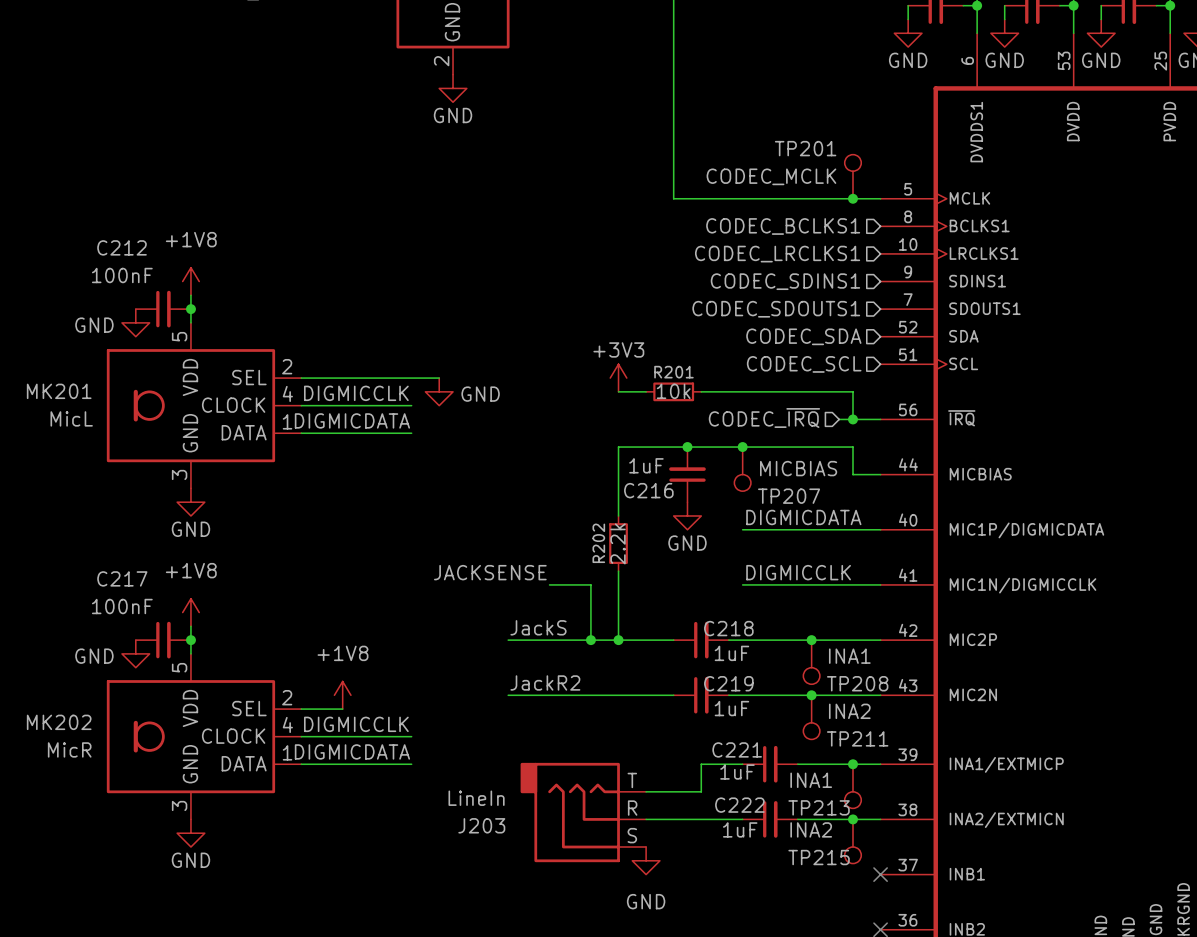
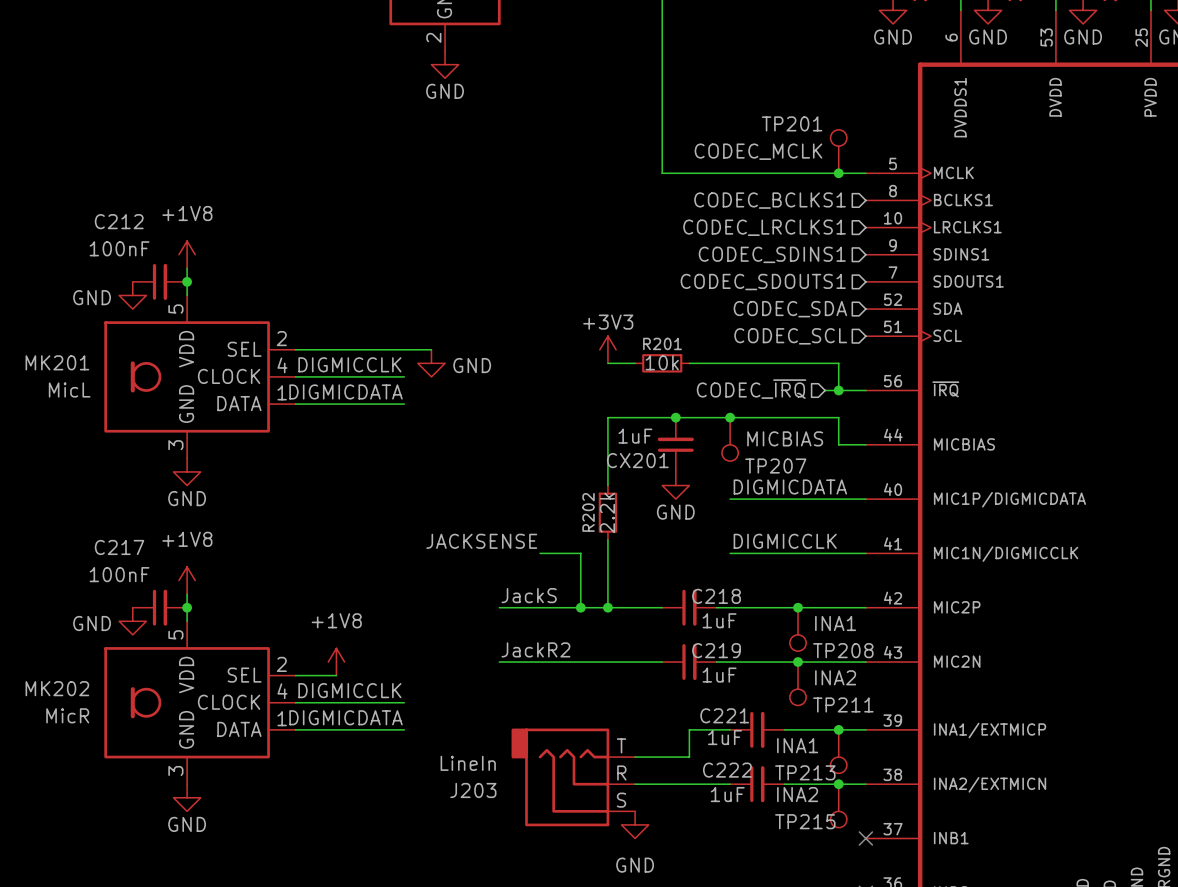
C216 name: C216 (648, 490) -> CX201 (637, 460)

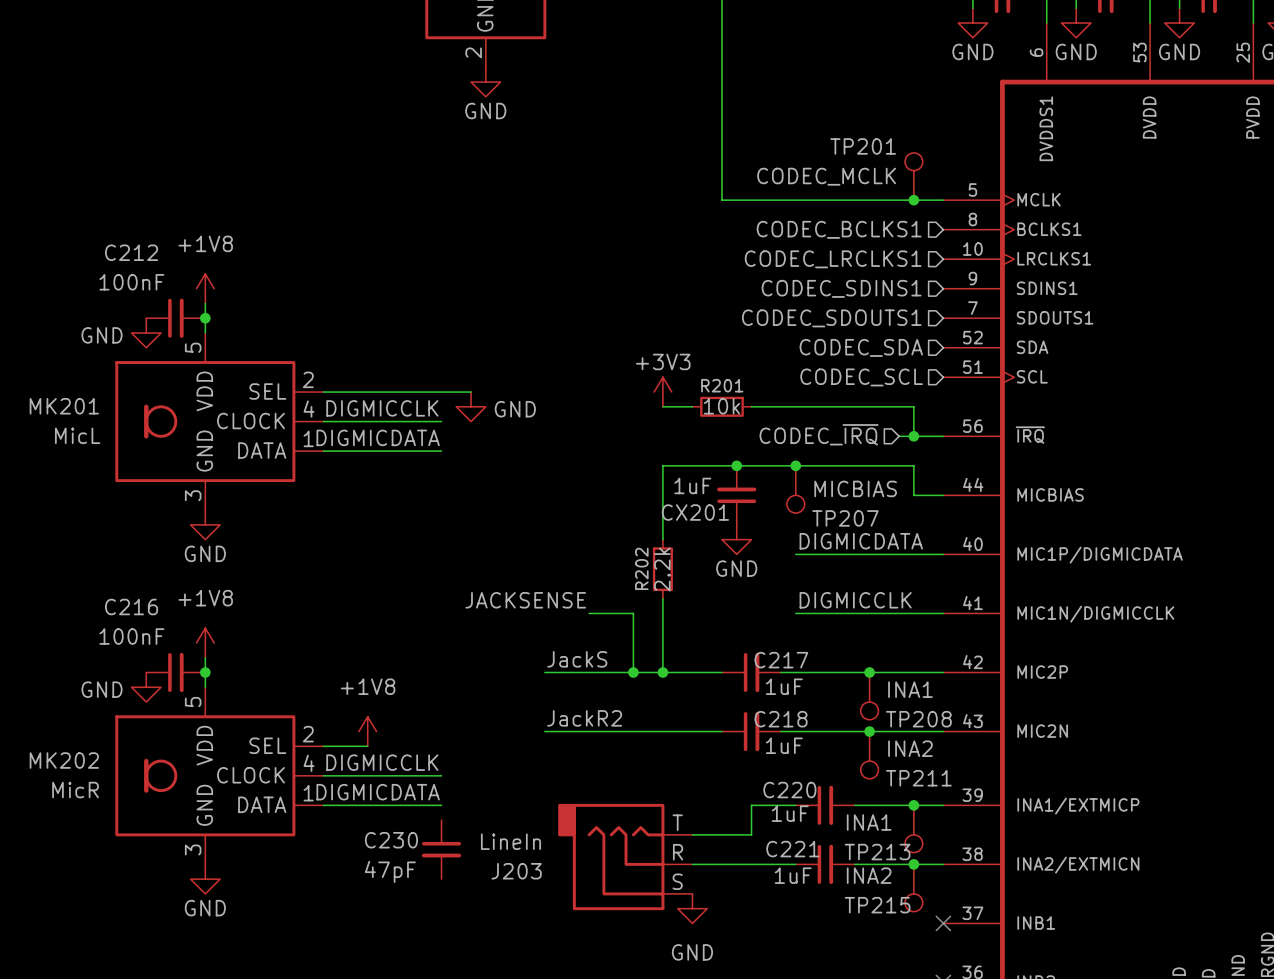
C217 name: C217 (119, 547) -> C216 (131, 607)
C218 name: C218 (716, 596) -> C217 (781, 660)
C219 name: C219 (716, 650) -> C218 (781, 719)
C221 name: C221 (724, 715) -> C220 (789, 790)
C230: none -> 47pF (441, 849)
C222 name: C222 (727, 770) -> C221 (792, 849)

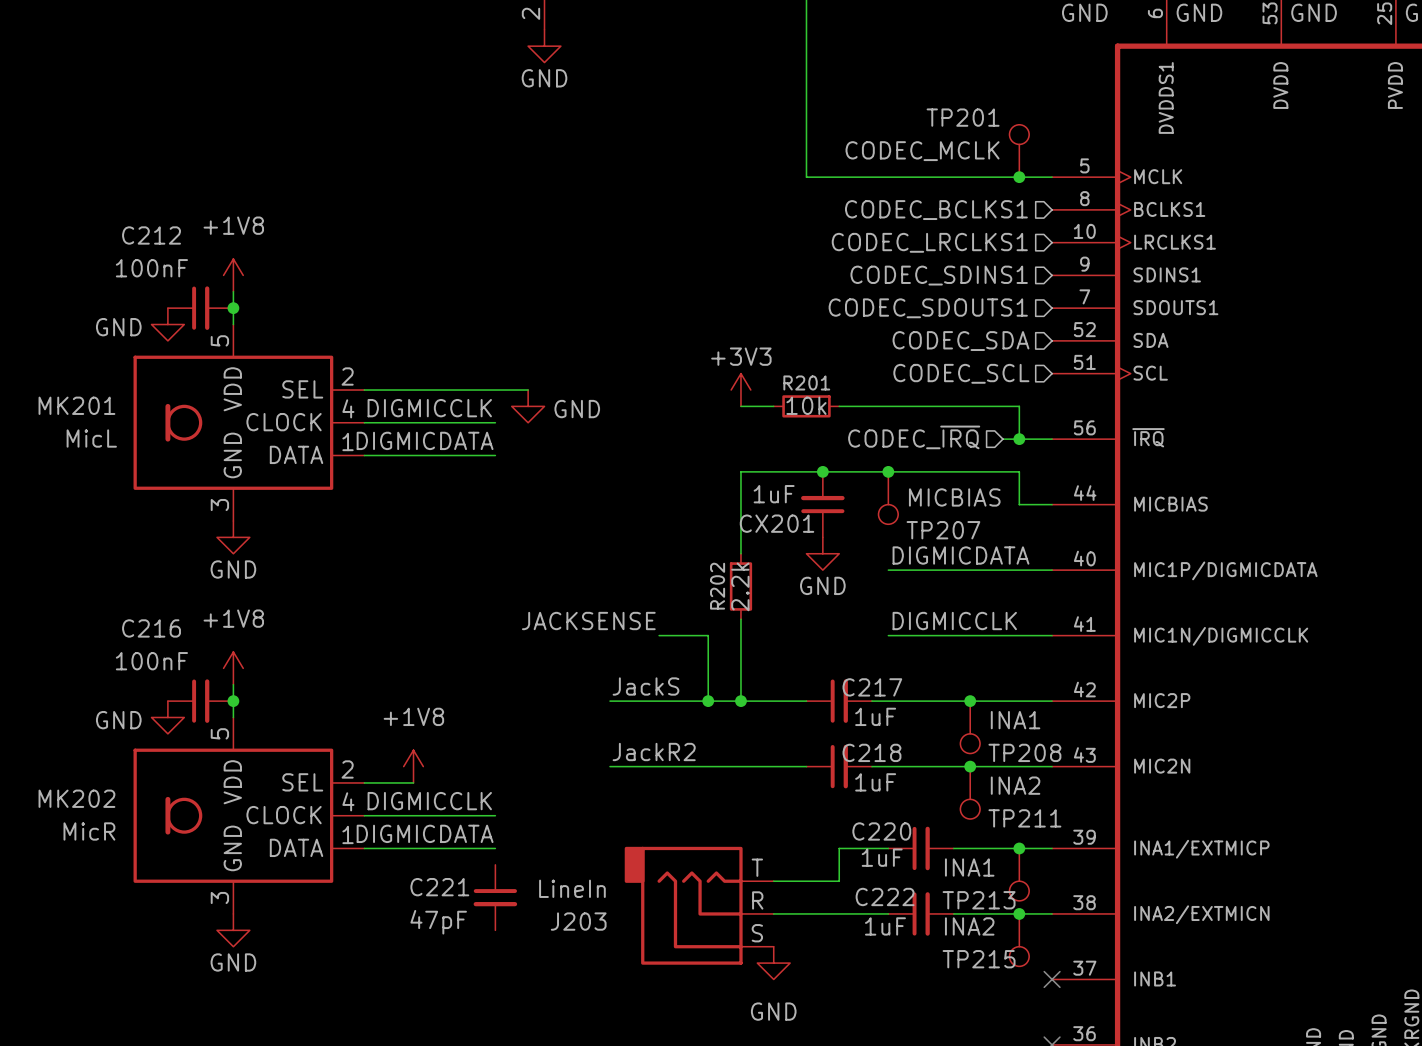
C230 name: C230 (391, 840) -> C221 (439, 887)
C221 name: C221 (792, 849) -> C222 (885, 896)

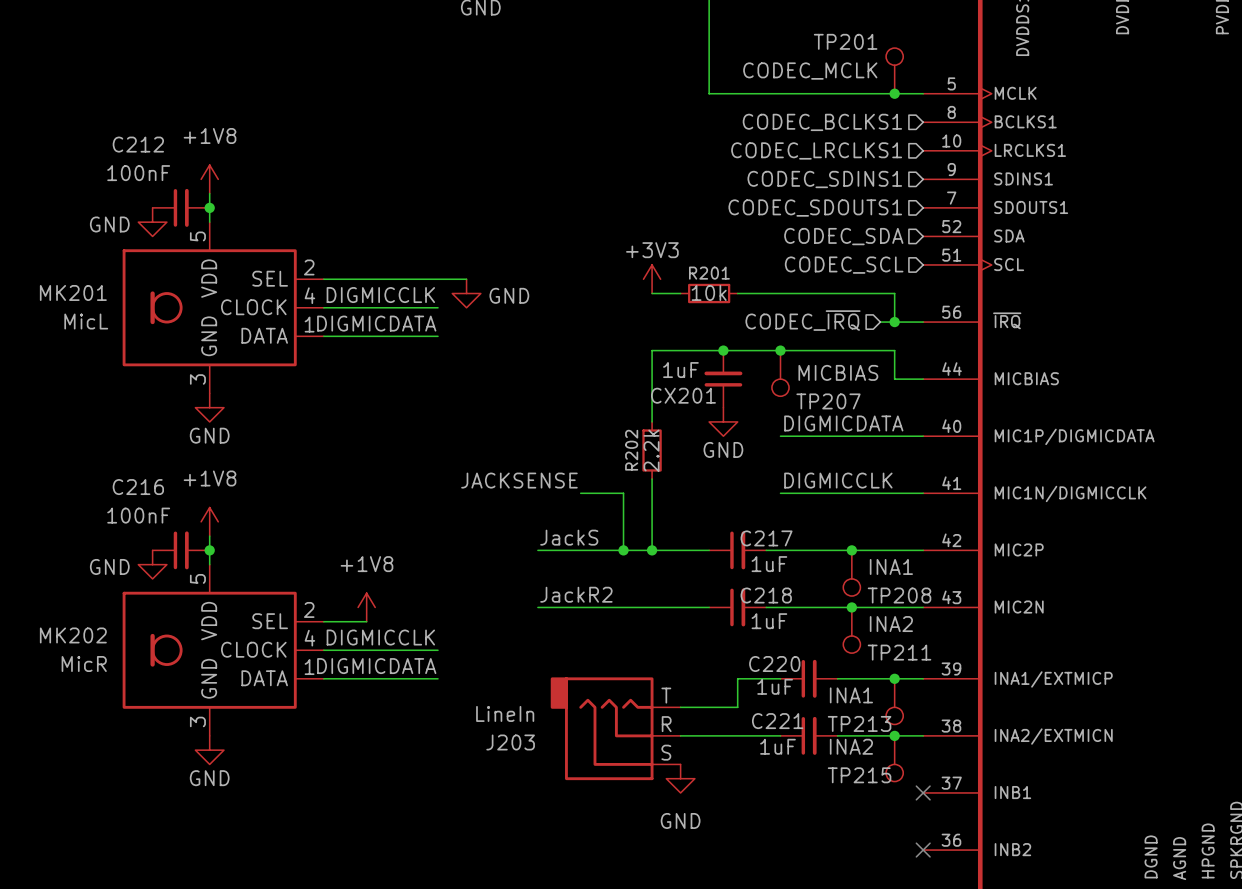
C222 name: C222 (885, 896) -> C221 (777, 721)
C221: 47pF (495, 897) -> none

